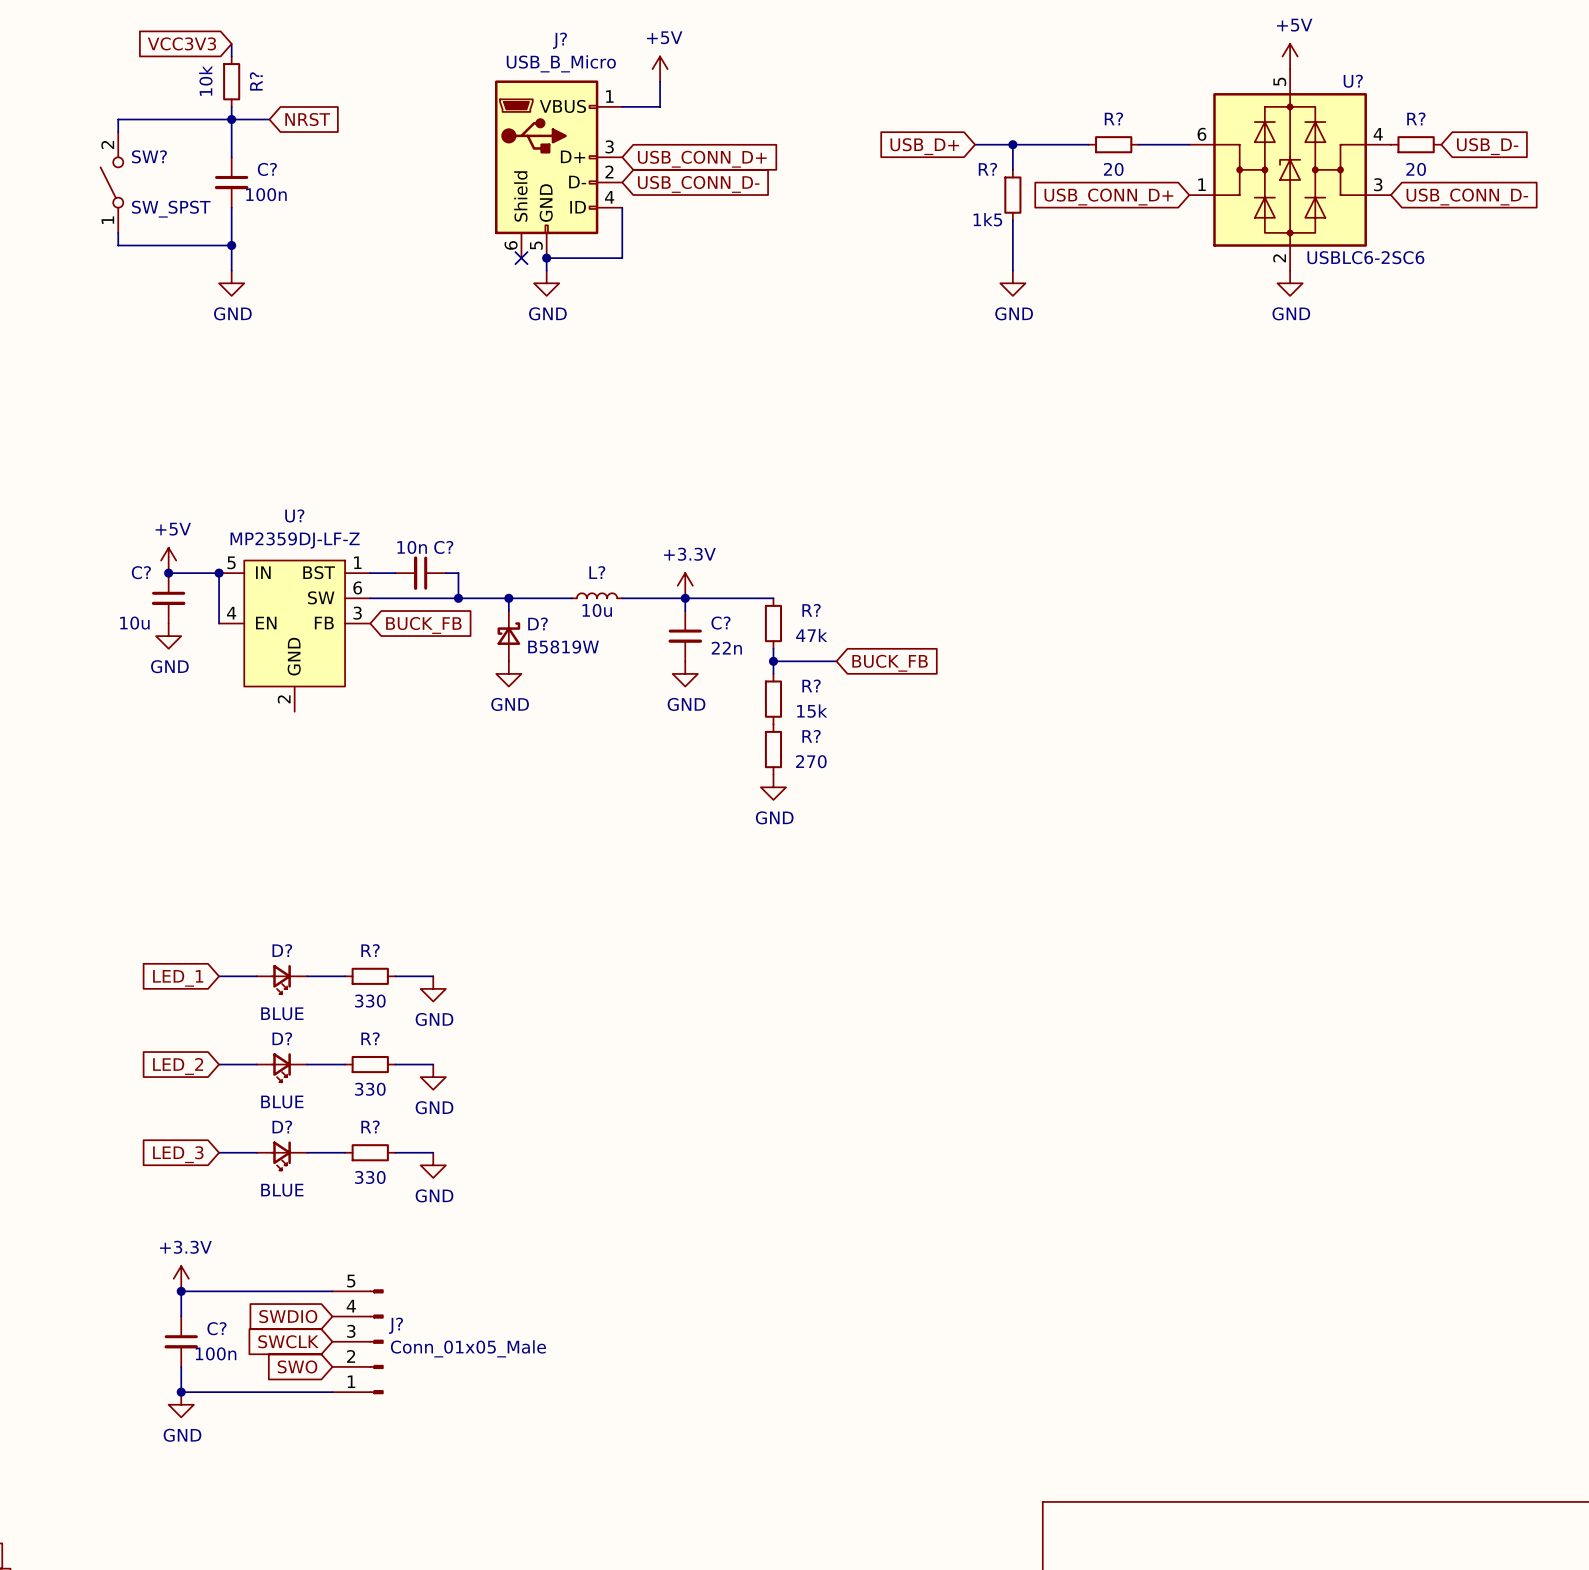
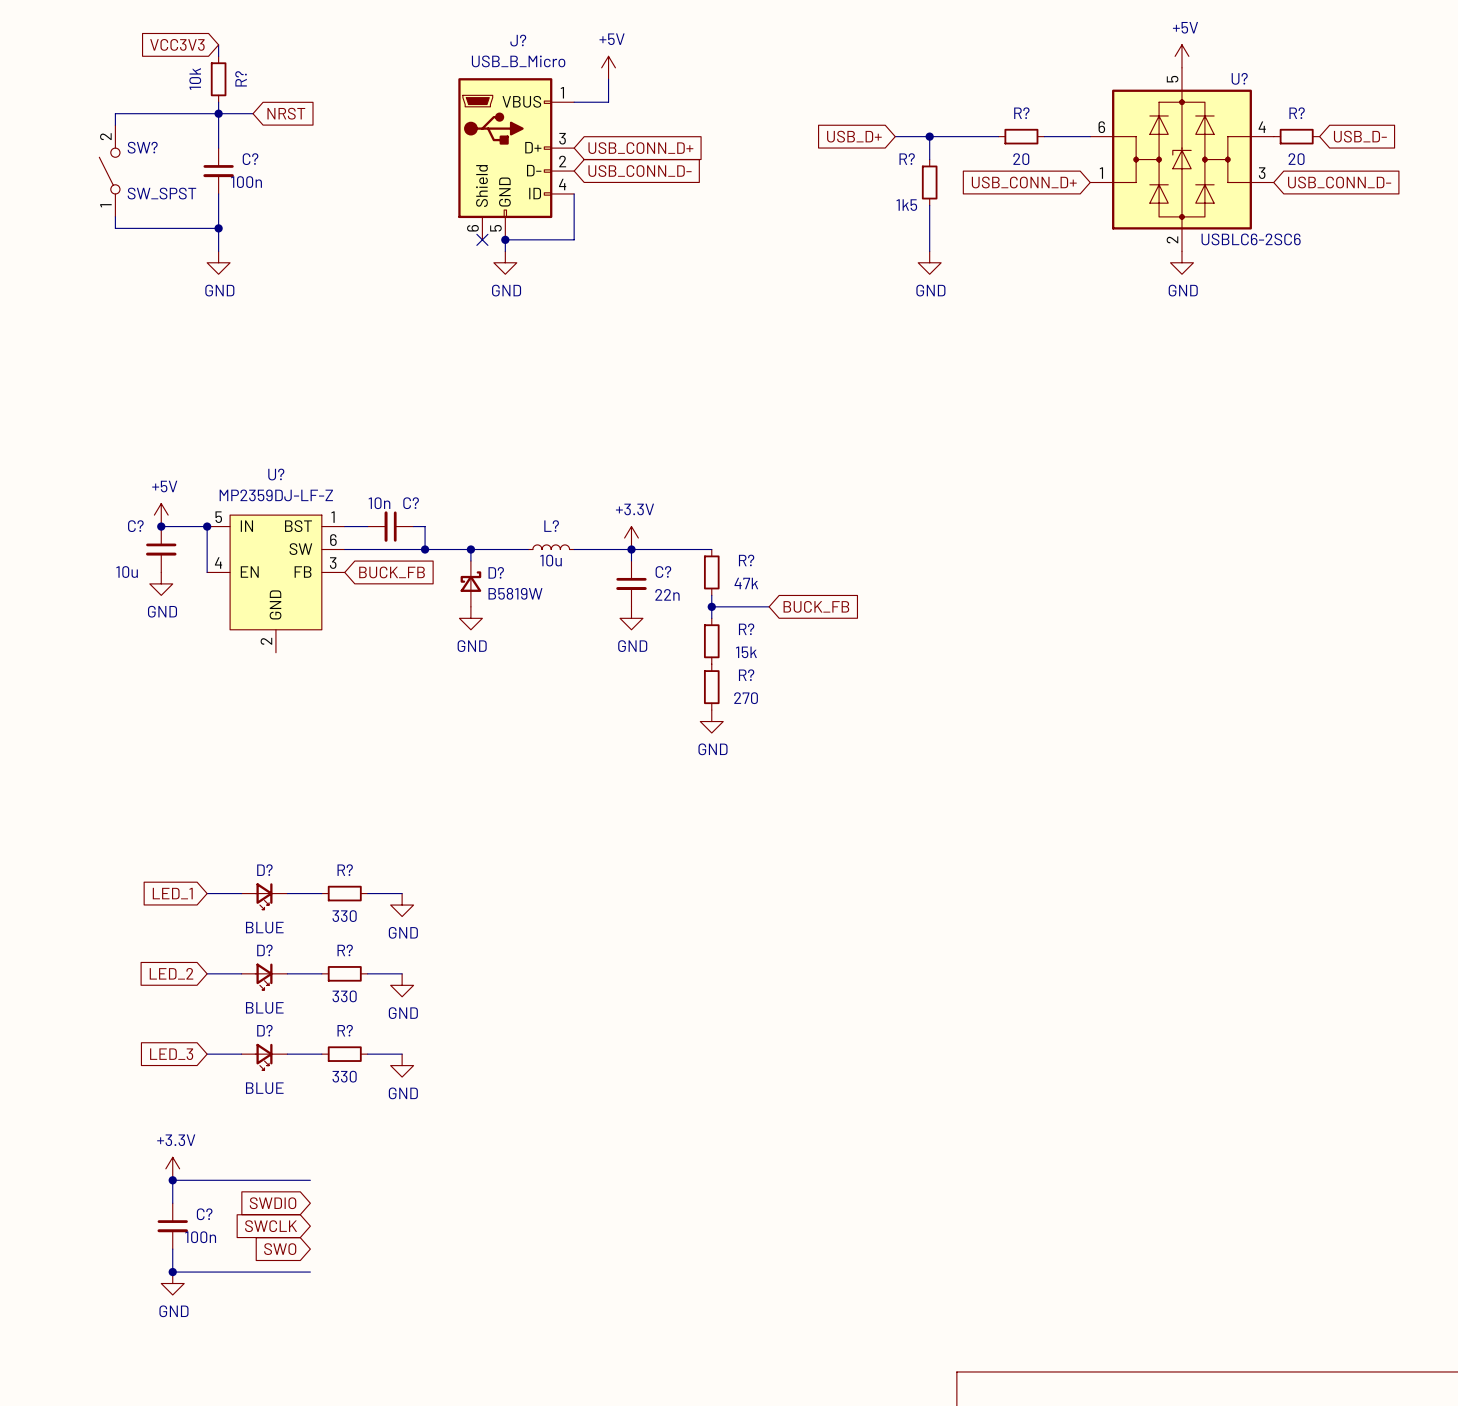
J?: Conn_01x05_Male (358, 1341) -> none

